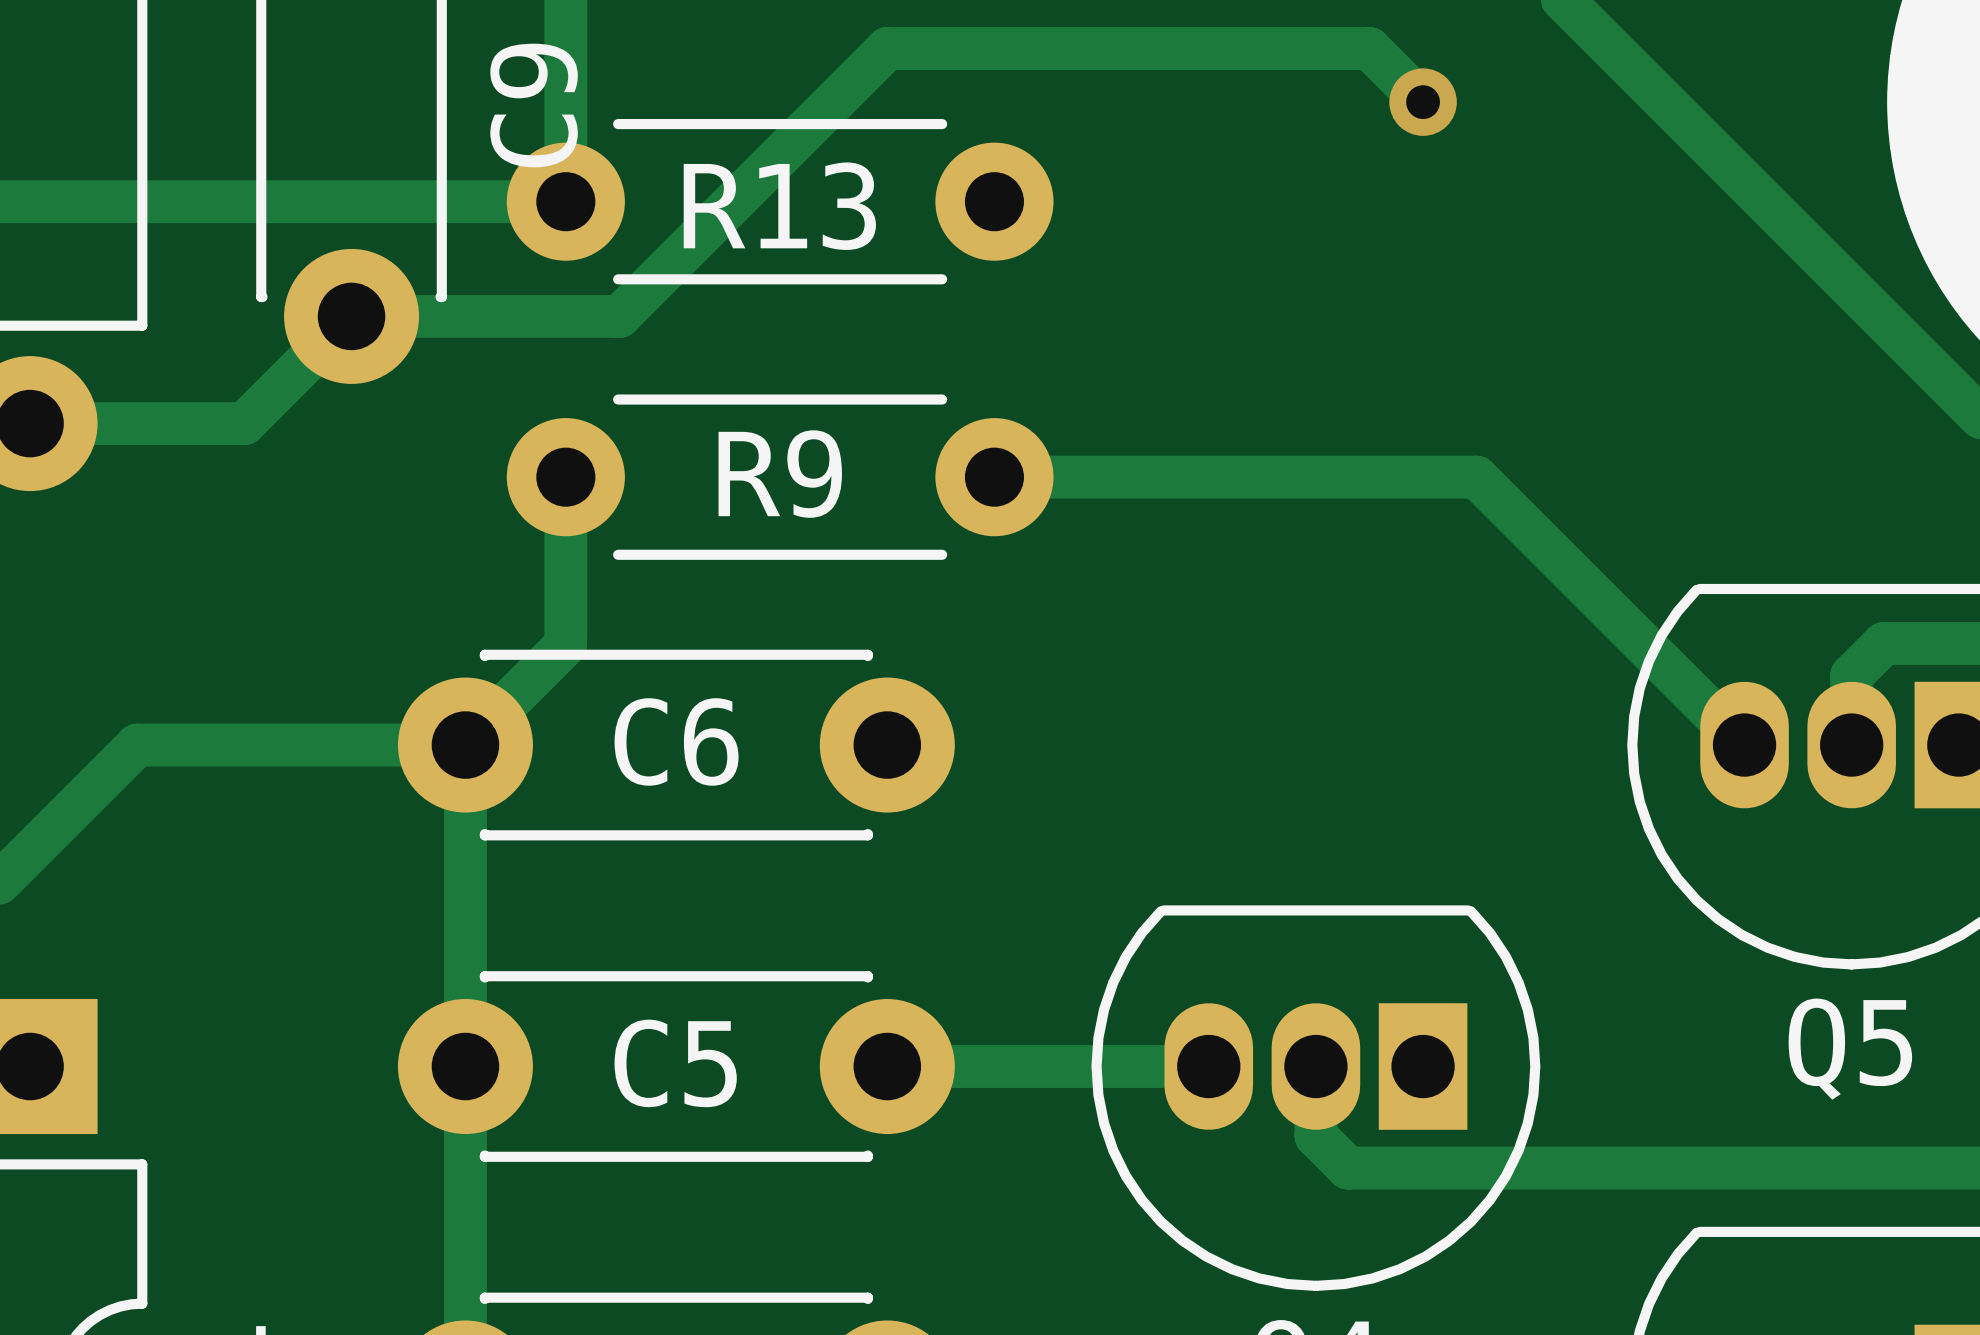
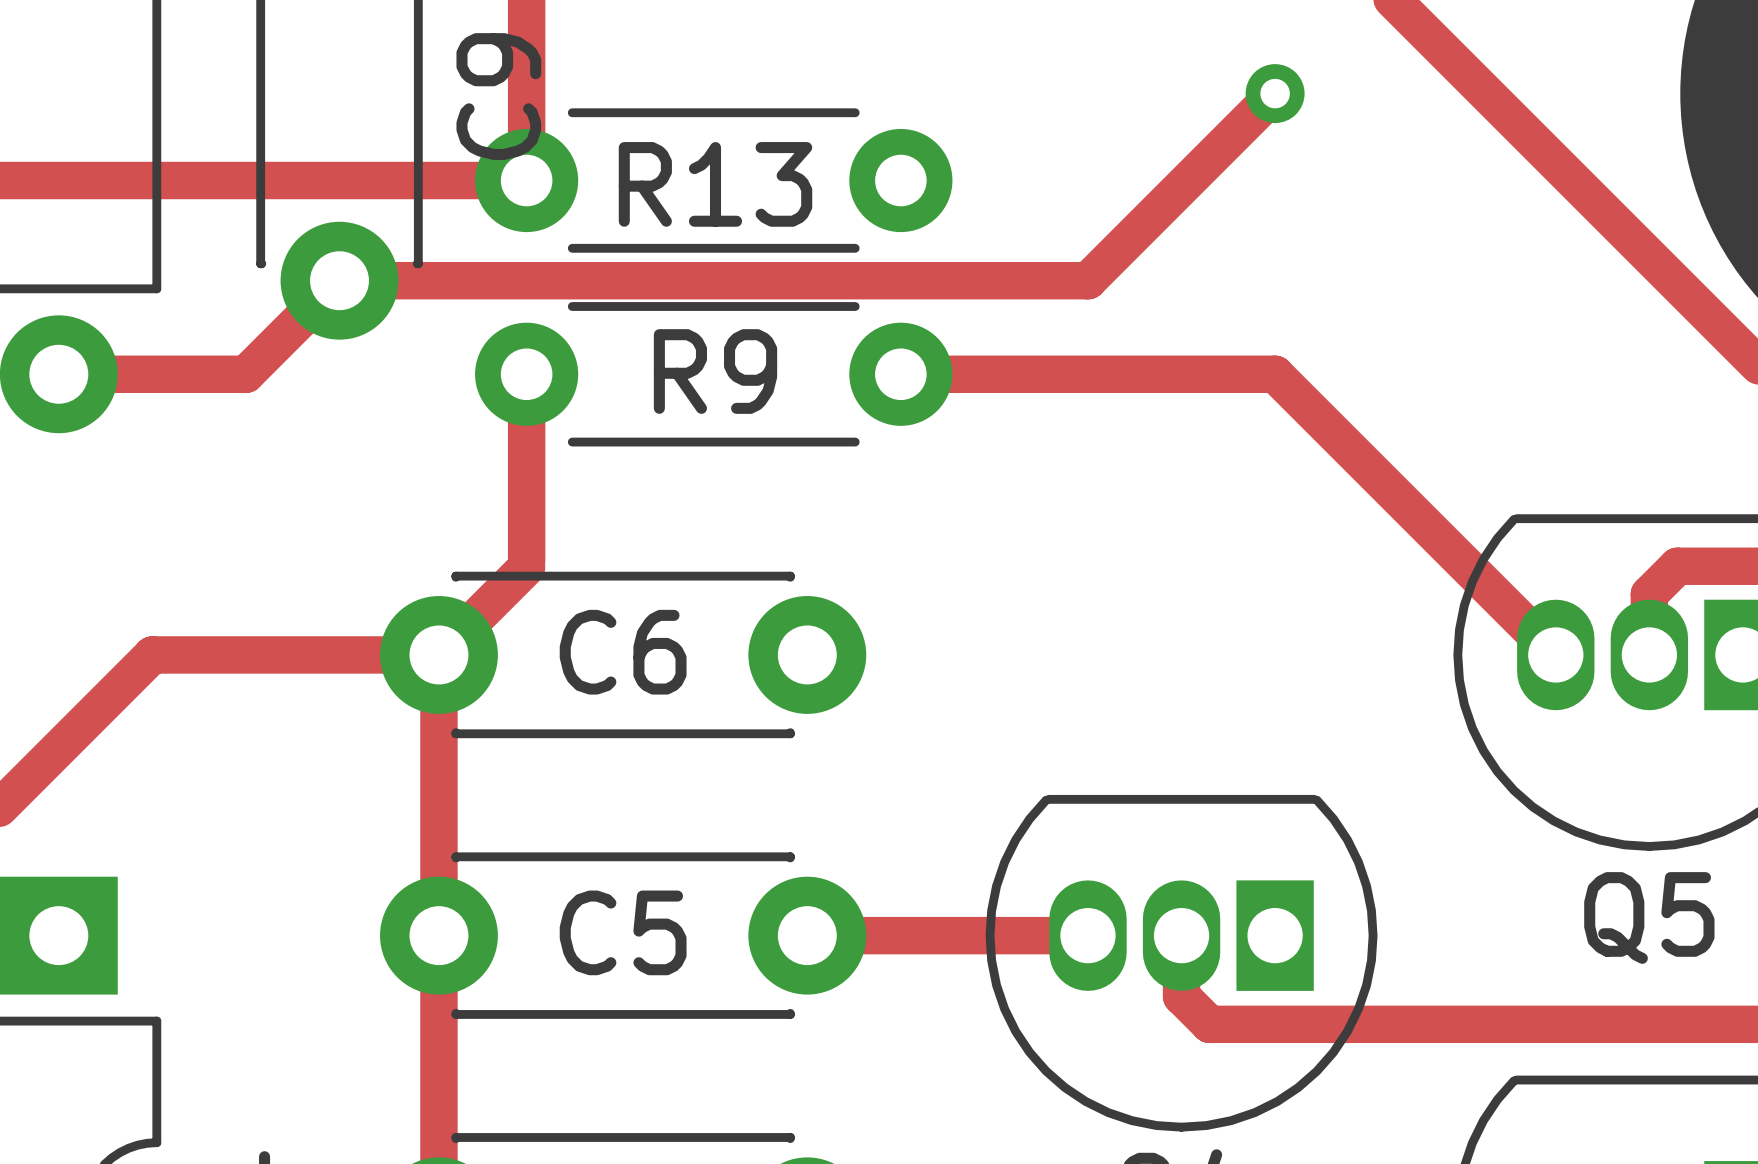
track: (1423, 102) (1369, 48) (887, 48) (619, 316) -> (1275, 93) (1087, 280) (573, 280)
R9 position: (780, 477) -> (713, 374)
track: (994, 477) (1476, 477) -> (900, 374) (1275, 374) (1321, 421)

